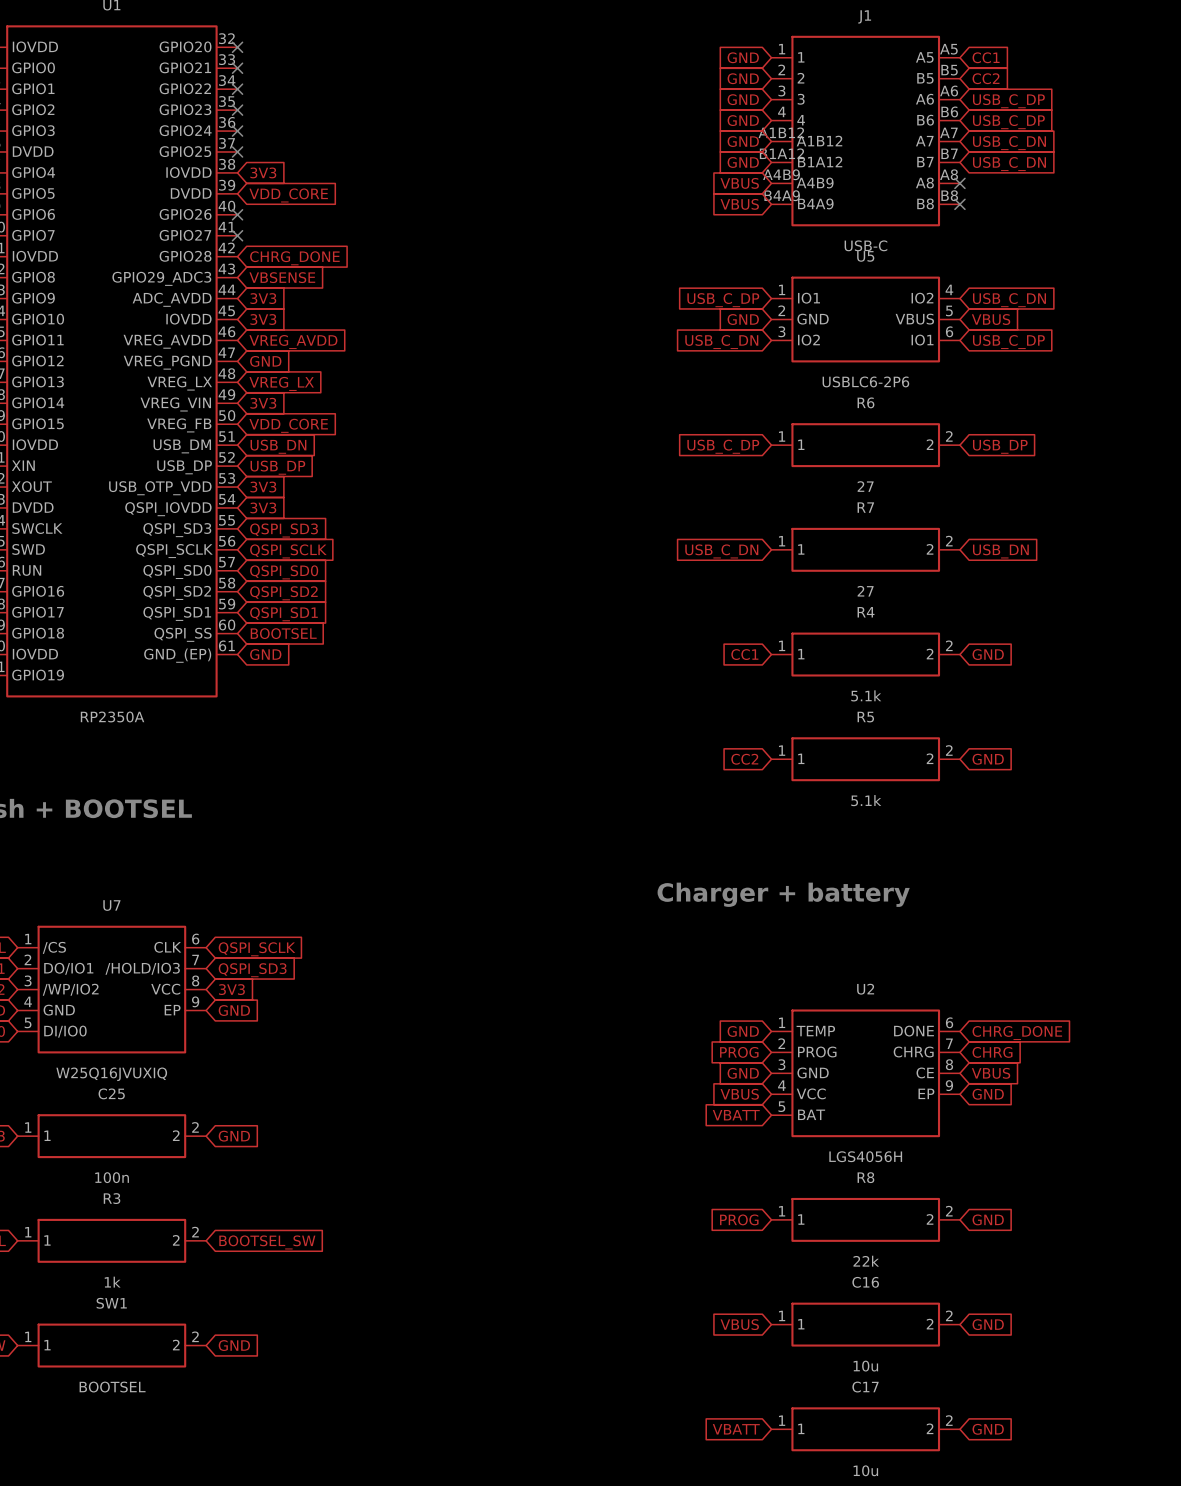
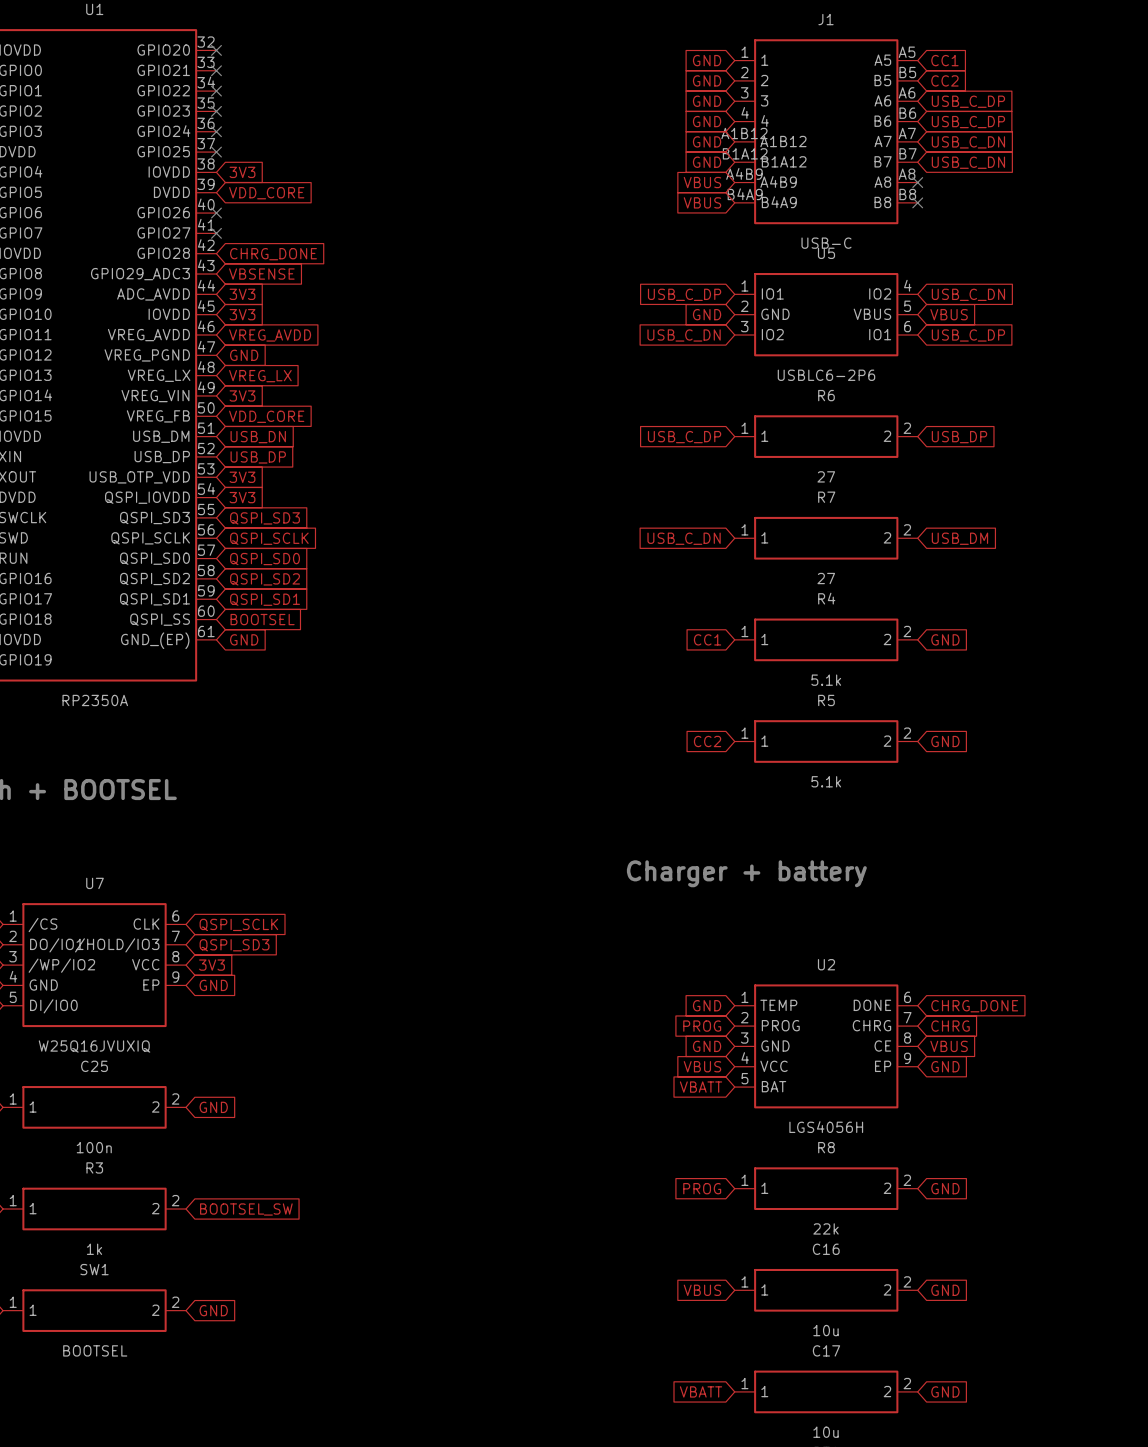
global label: USB_DN (1000, 551) -> USB_DM (959, 538)

